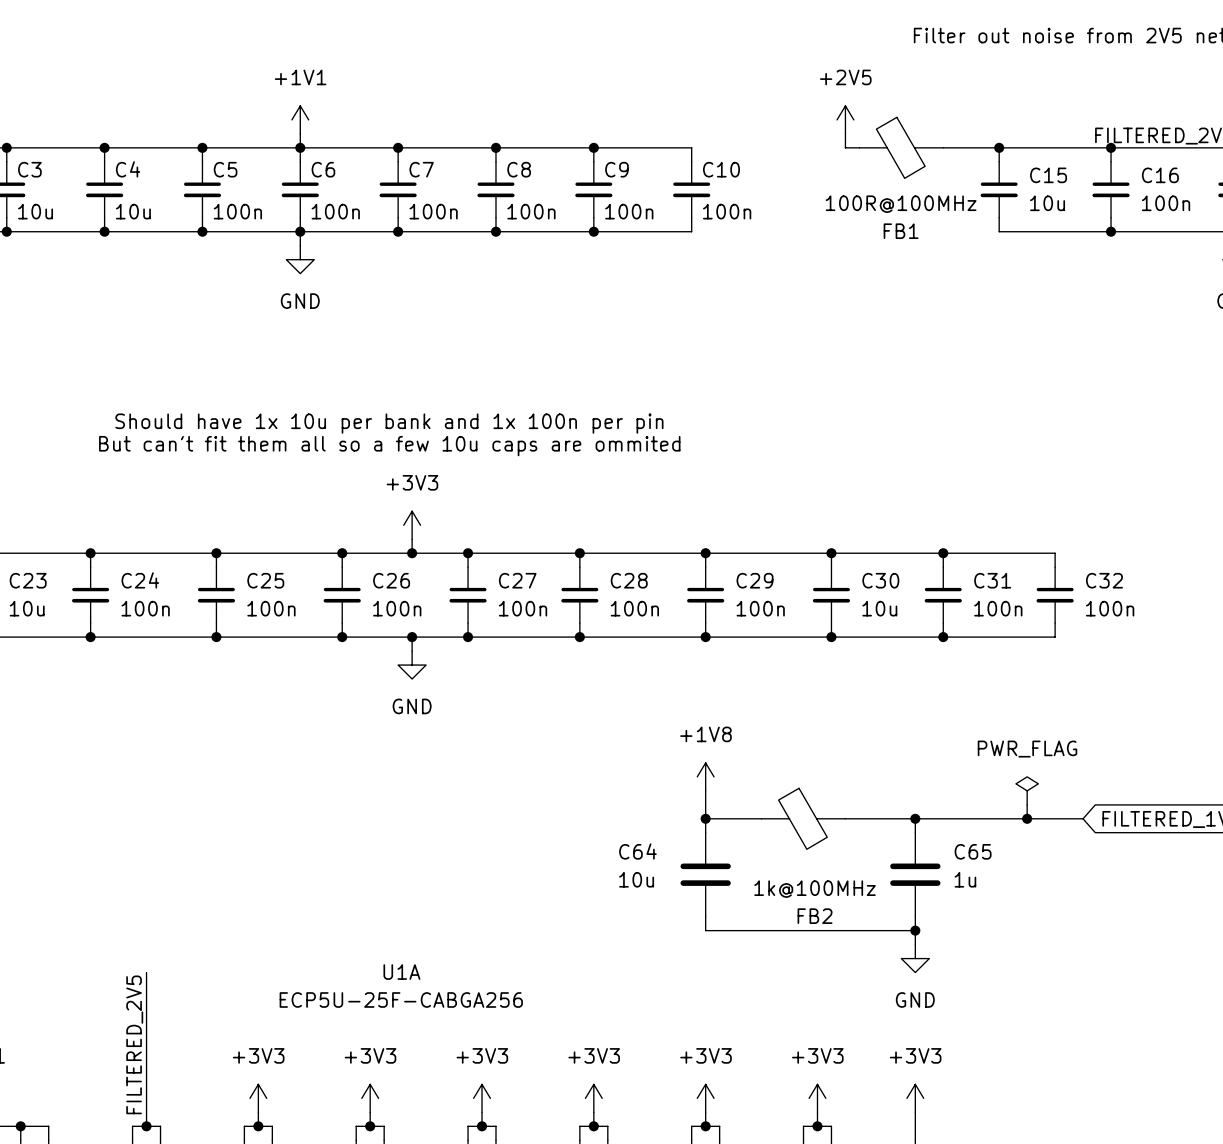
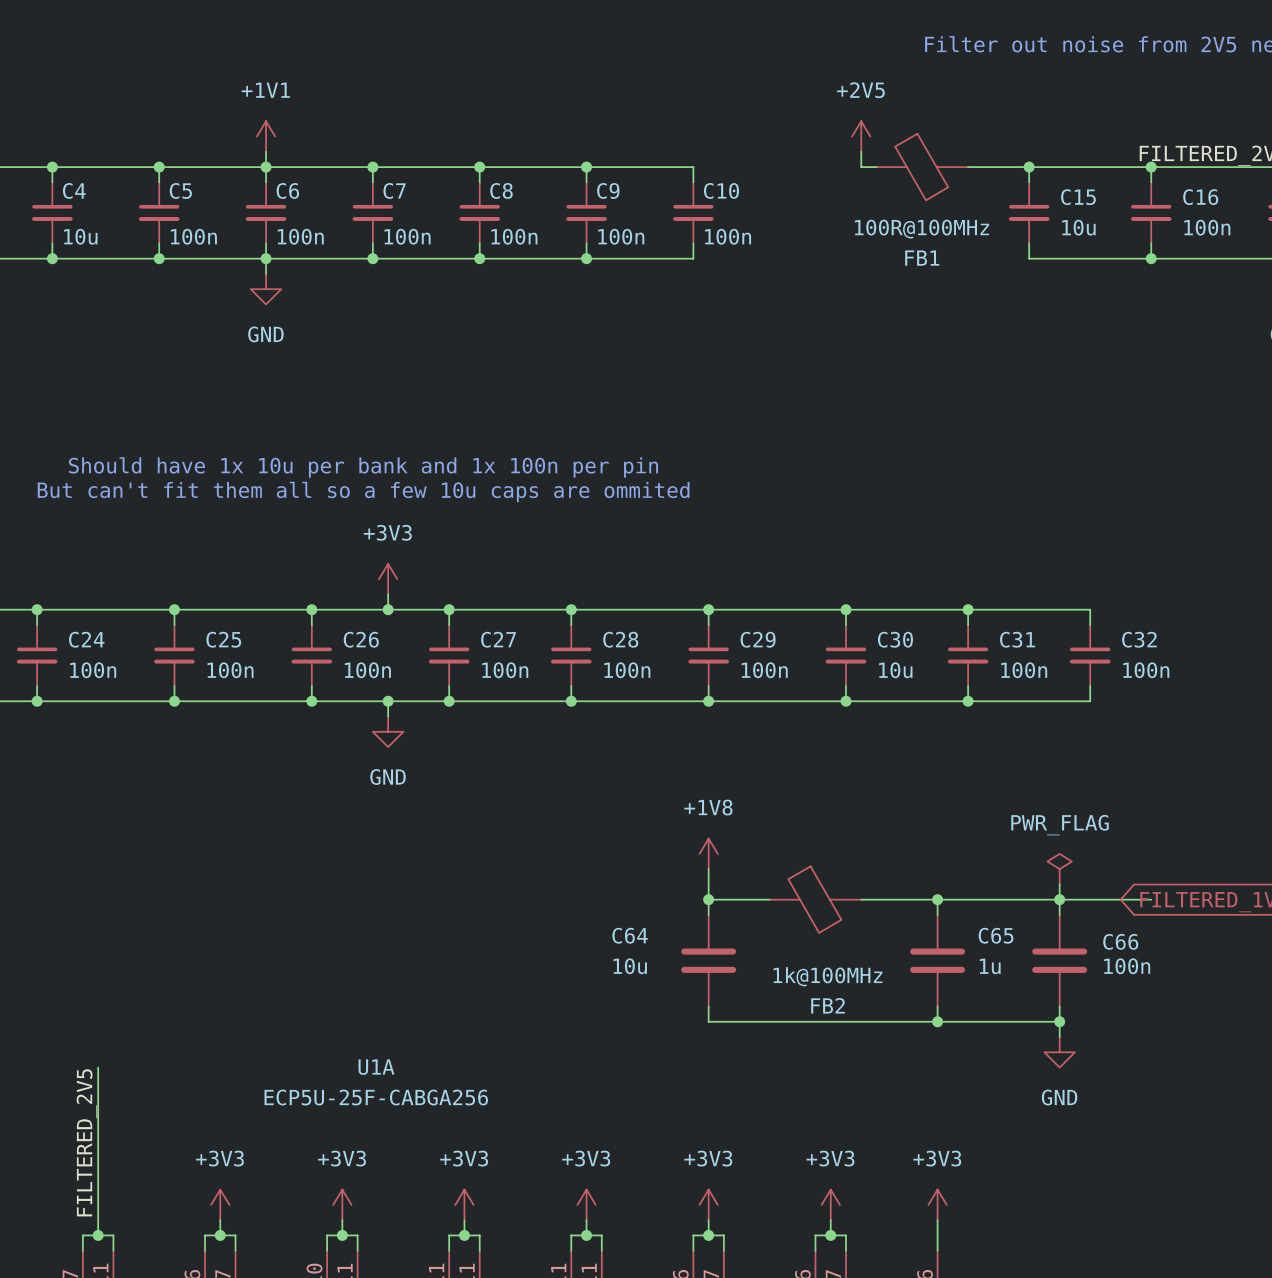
wire: none -> (1059, 899) (1059, 914)
wire: none -> (1120, 899) (1151, 899)
C66: none -> 100n (1059, 960)
wire: none -> (1059, 1006) (1059, 1037)
wire: (915, 930) (915, 944) -> (937, 1021) (1059, 1021)
junction: none -> (1059, 1021)
power symbol position: GND (915, 958) -> GND (1059, 1052)

